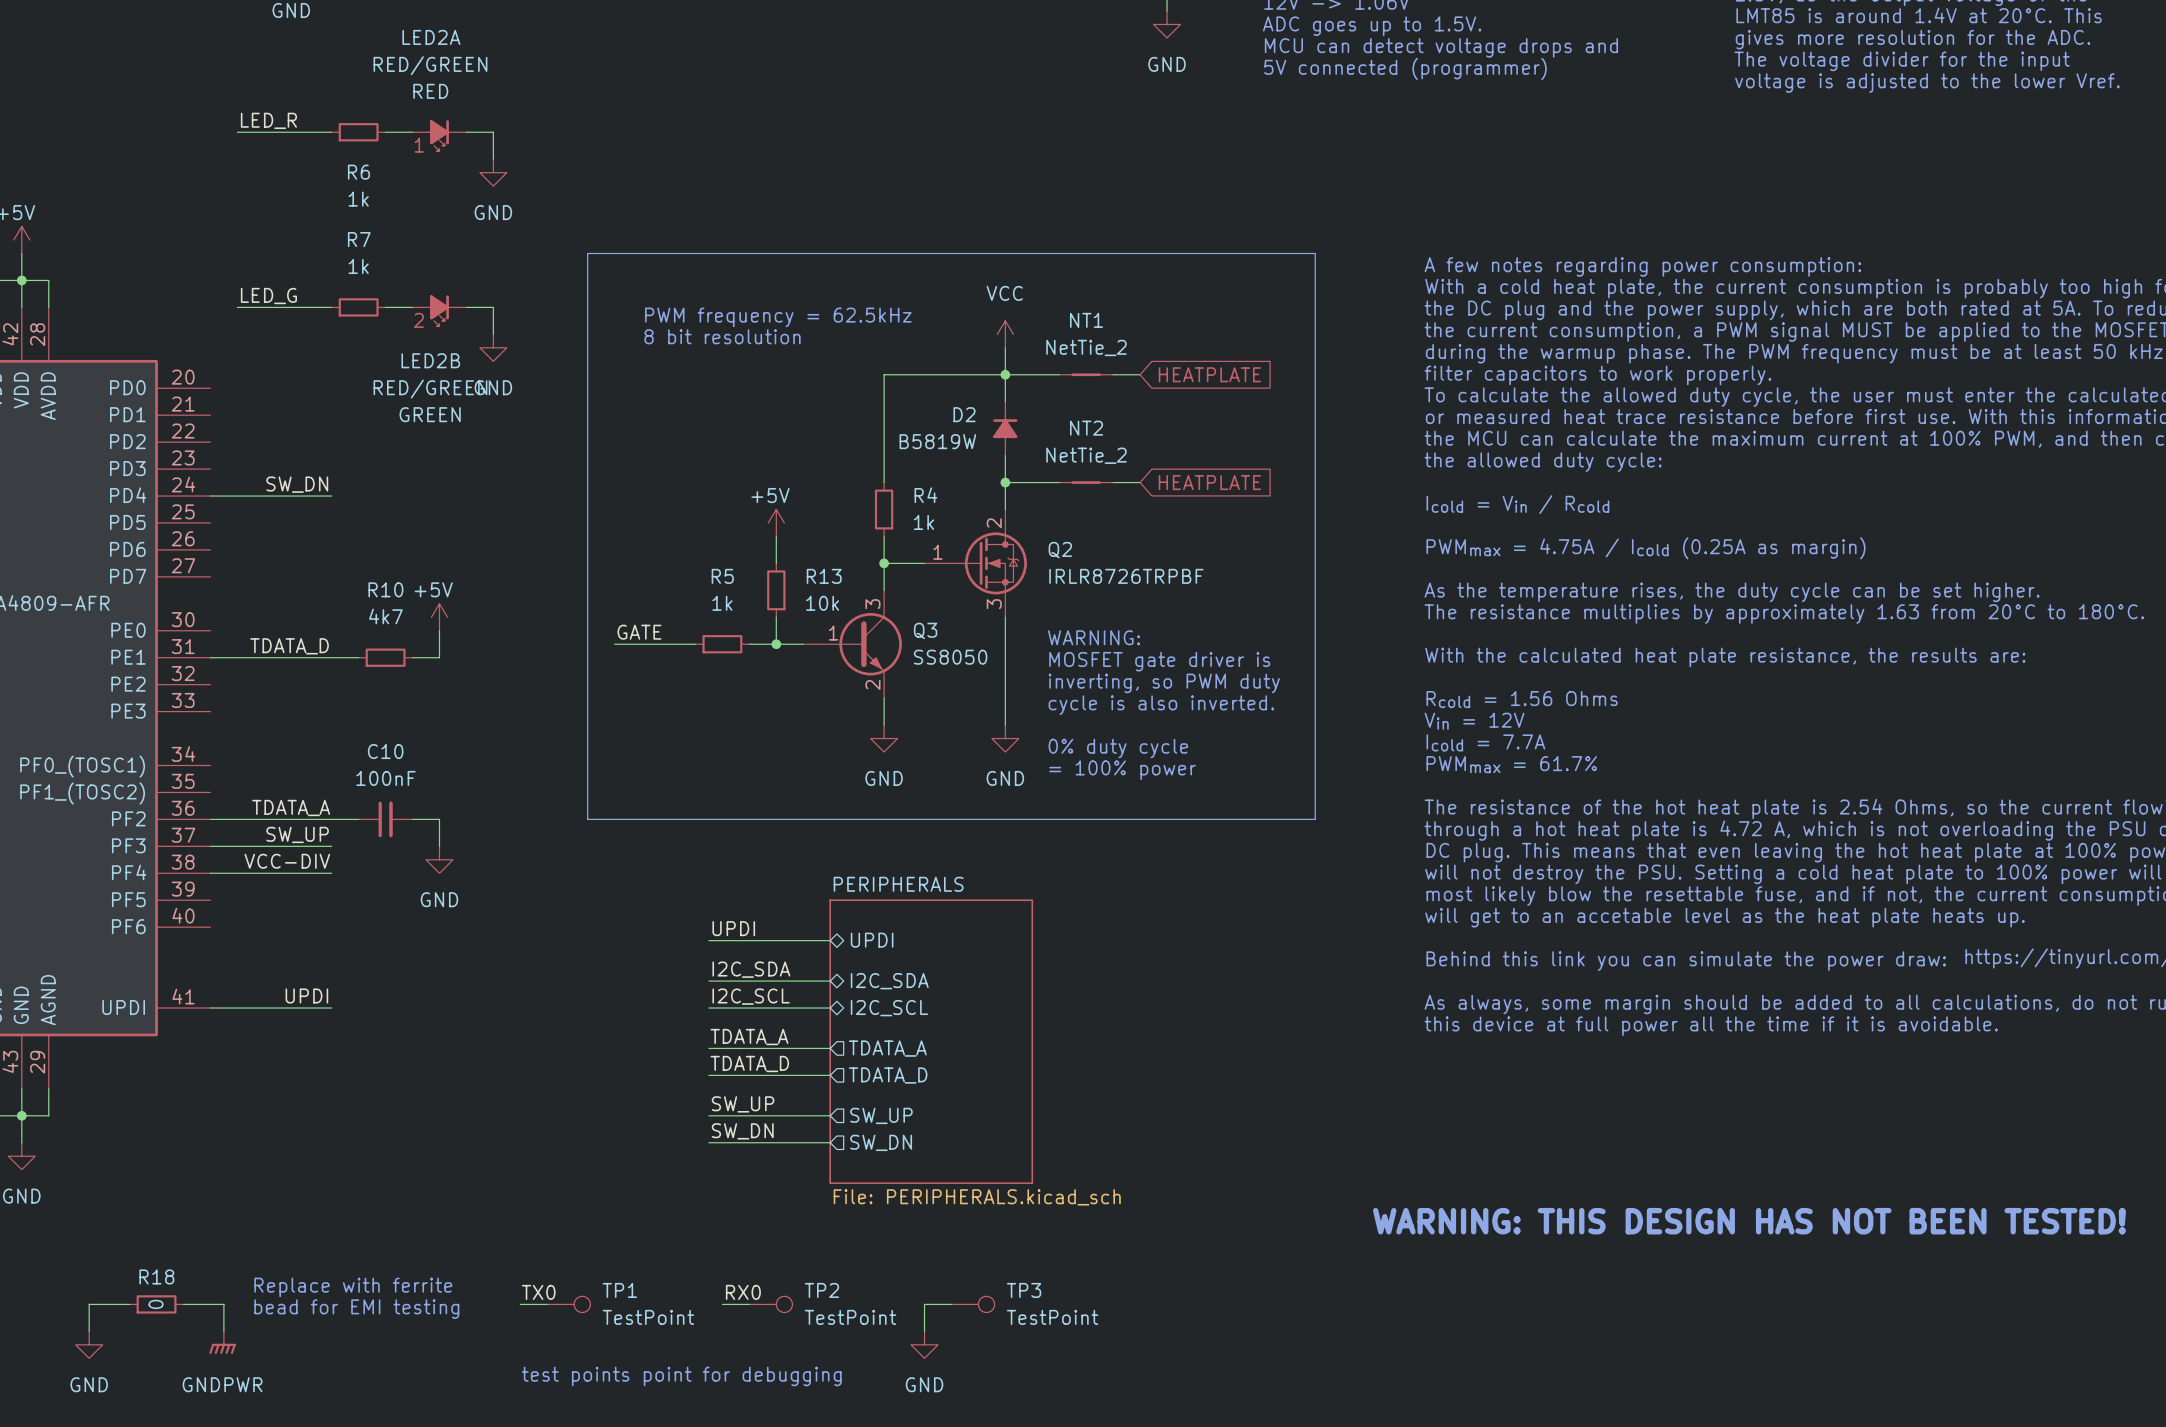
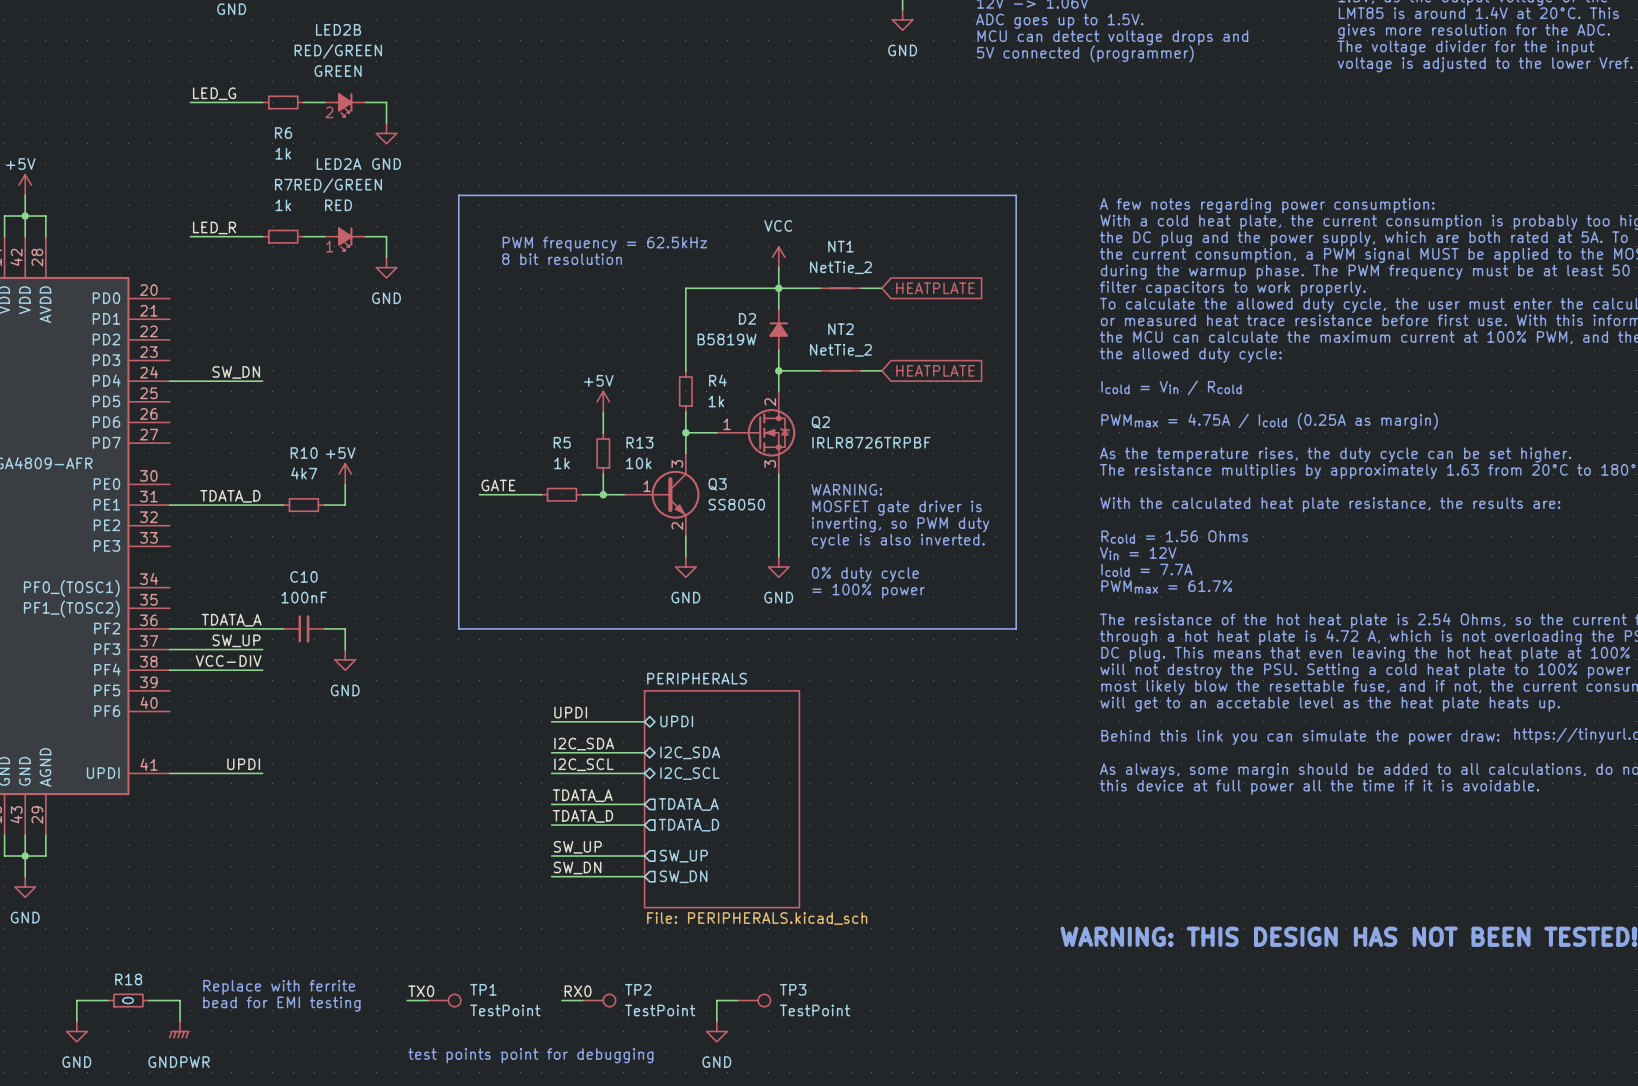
label: LED_R (268, 120) -> LED_G (214, 93)
LED2A position: (439, 135) -> (345, 239)
label: LED_G (268, 296) -> LED_R (214, 227)
LED2B position: (439, 310) -> (345, 105)
LED2B name position: LED2B (430, 360) -> LED2B (338, 29)
LED2B value position: RED/GREEN (430, 389) -> RED/GREEN (338, 51)
LED2B text position: GREEN (430, 414) -> GREEN (338, 71)

